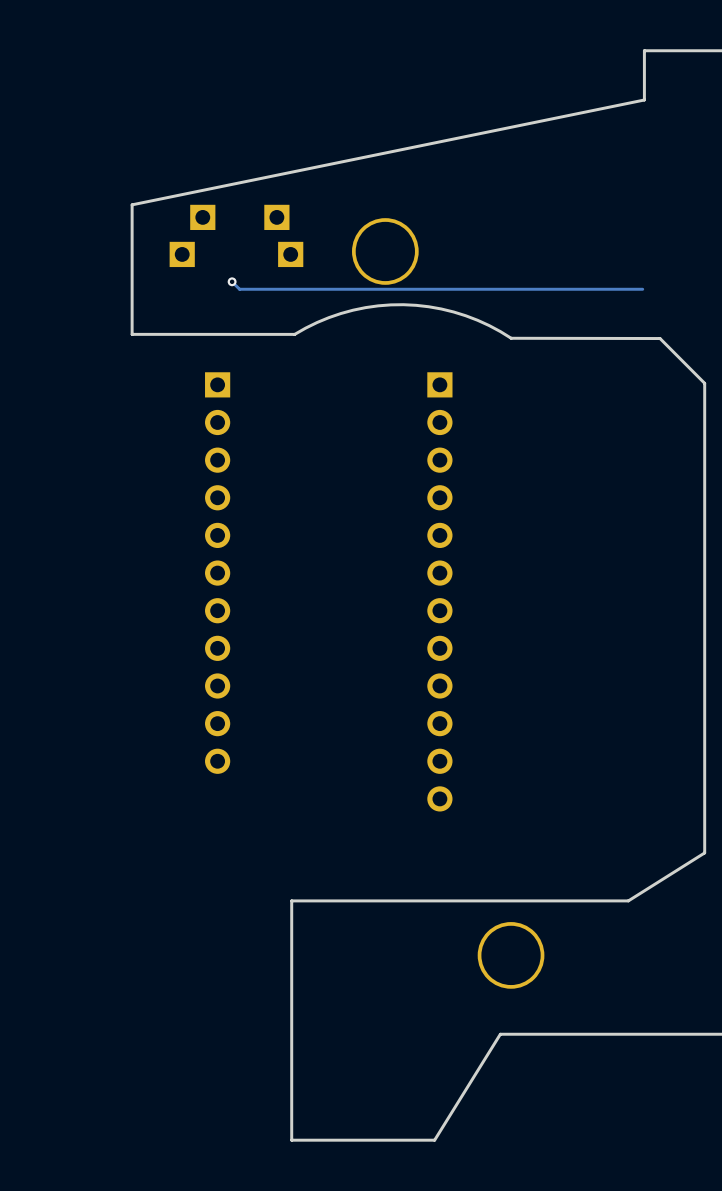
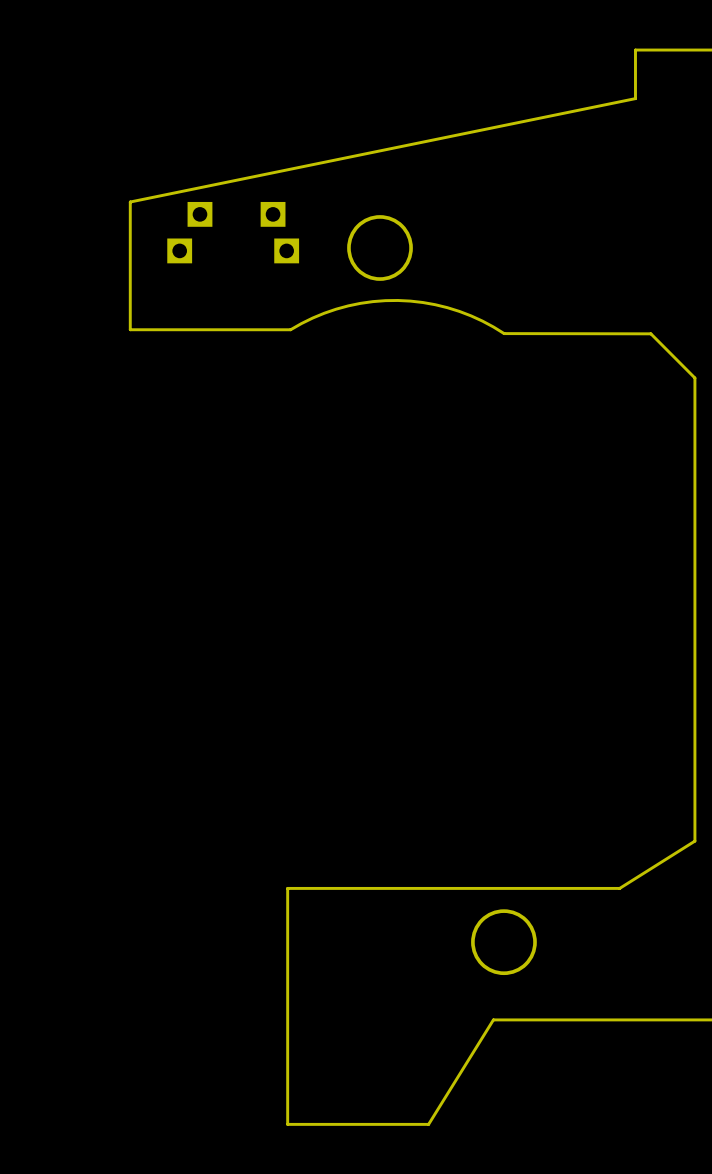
track: (232, 281) (239, 289) (642, 289) -> none
via: (232, 281) -> none
part: (217, 573) -> none
part: (439, 591) -> none

